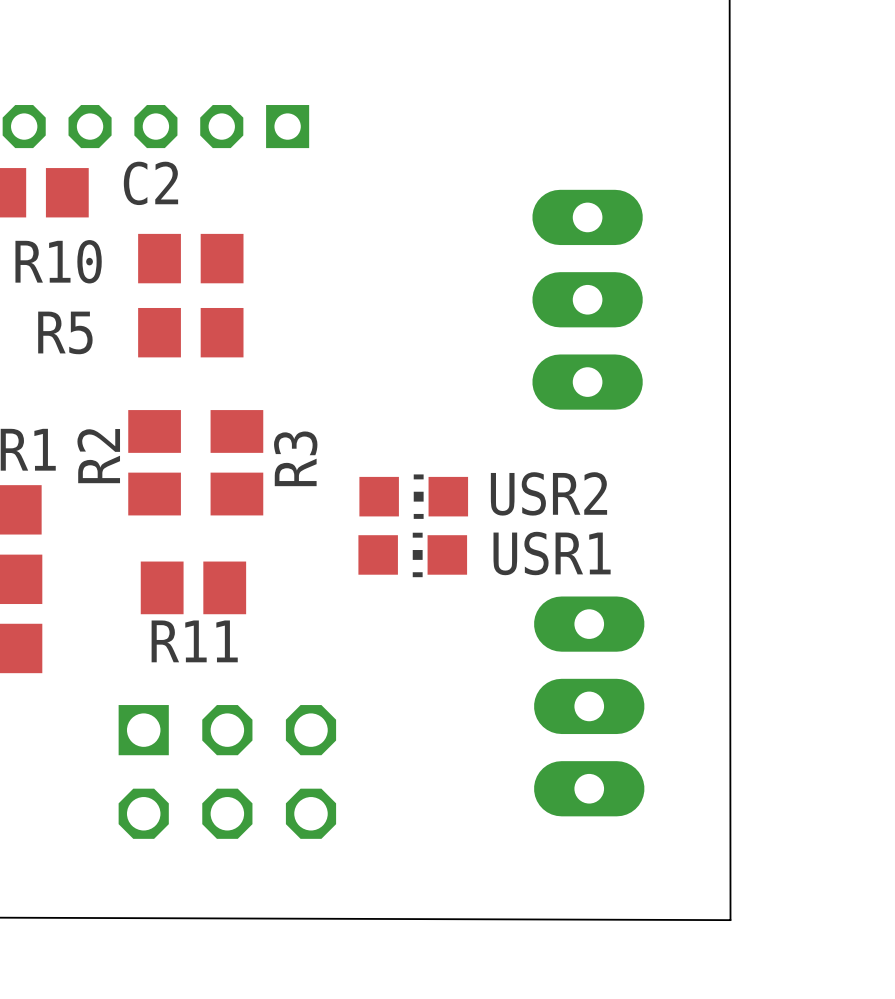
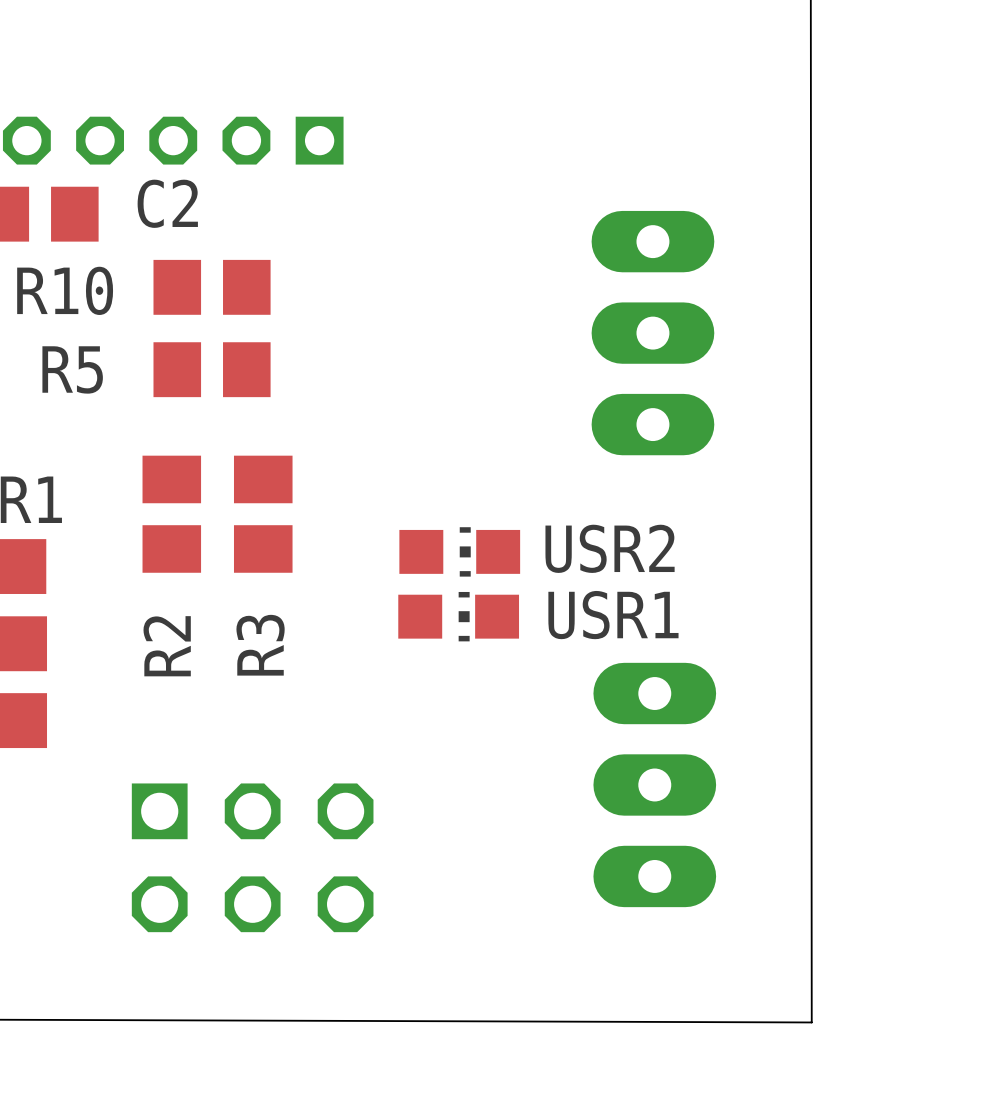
R2 name position: R2 (98, 456) -> R2 (167, 646)
R3 name position: R3 (295, 458) -> R3 (260, 645)
R11: (193, 587) -> none

